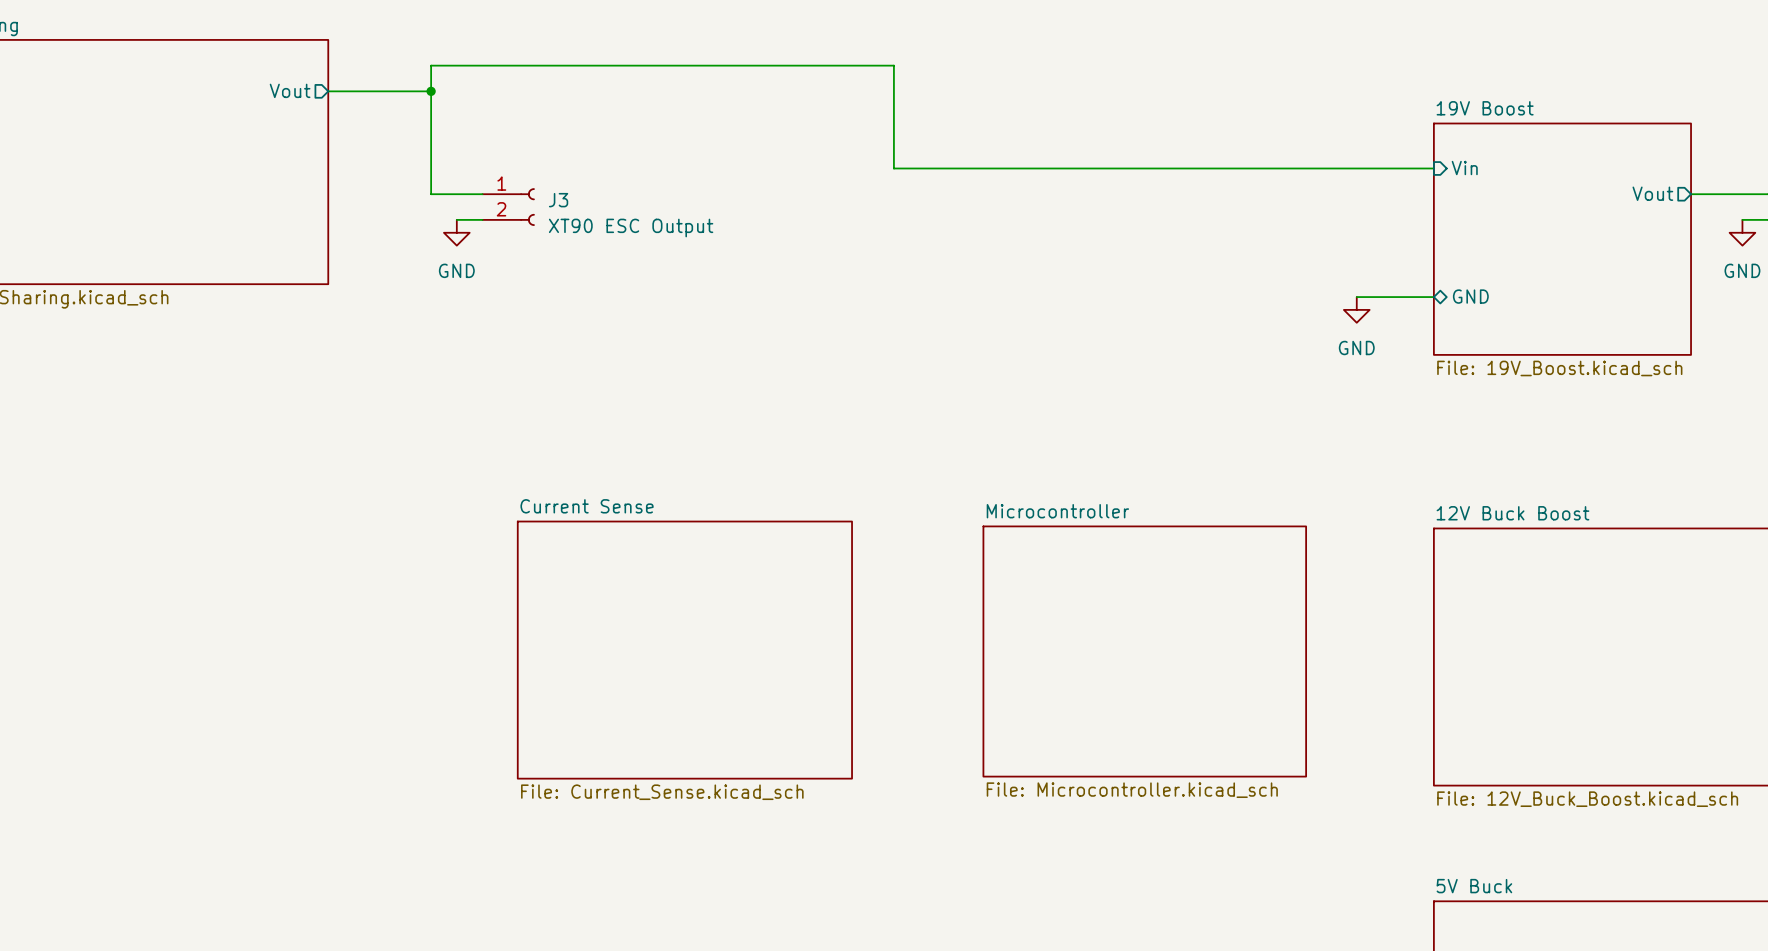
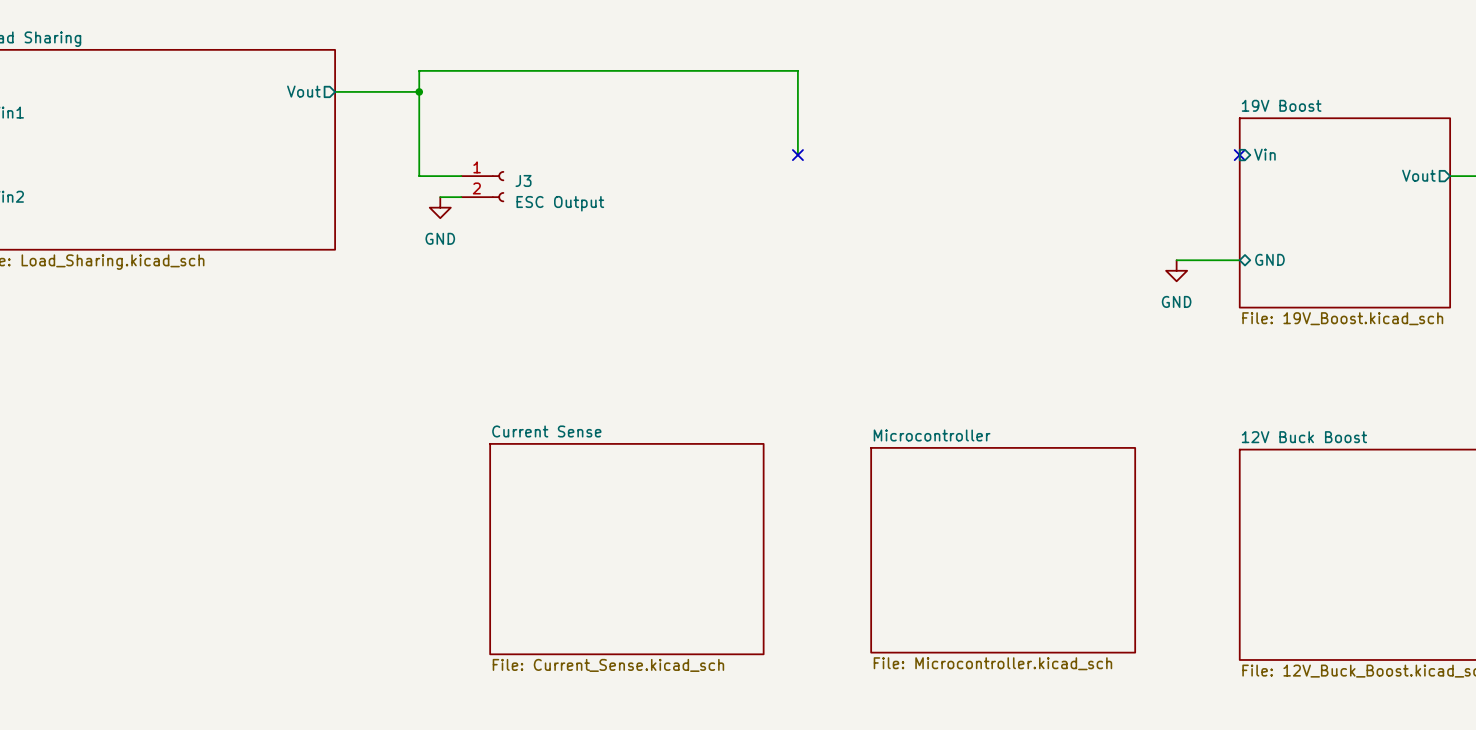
wire: (893, 168) (1433, 168) -> none
no-connect mark: none -> (797, 155)
no-connect mark: none -> (1239, 155)
J3 value: XT90 ESC Output (631, 228) -> ESC Output (560, 203)

